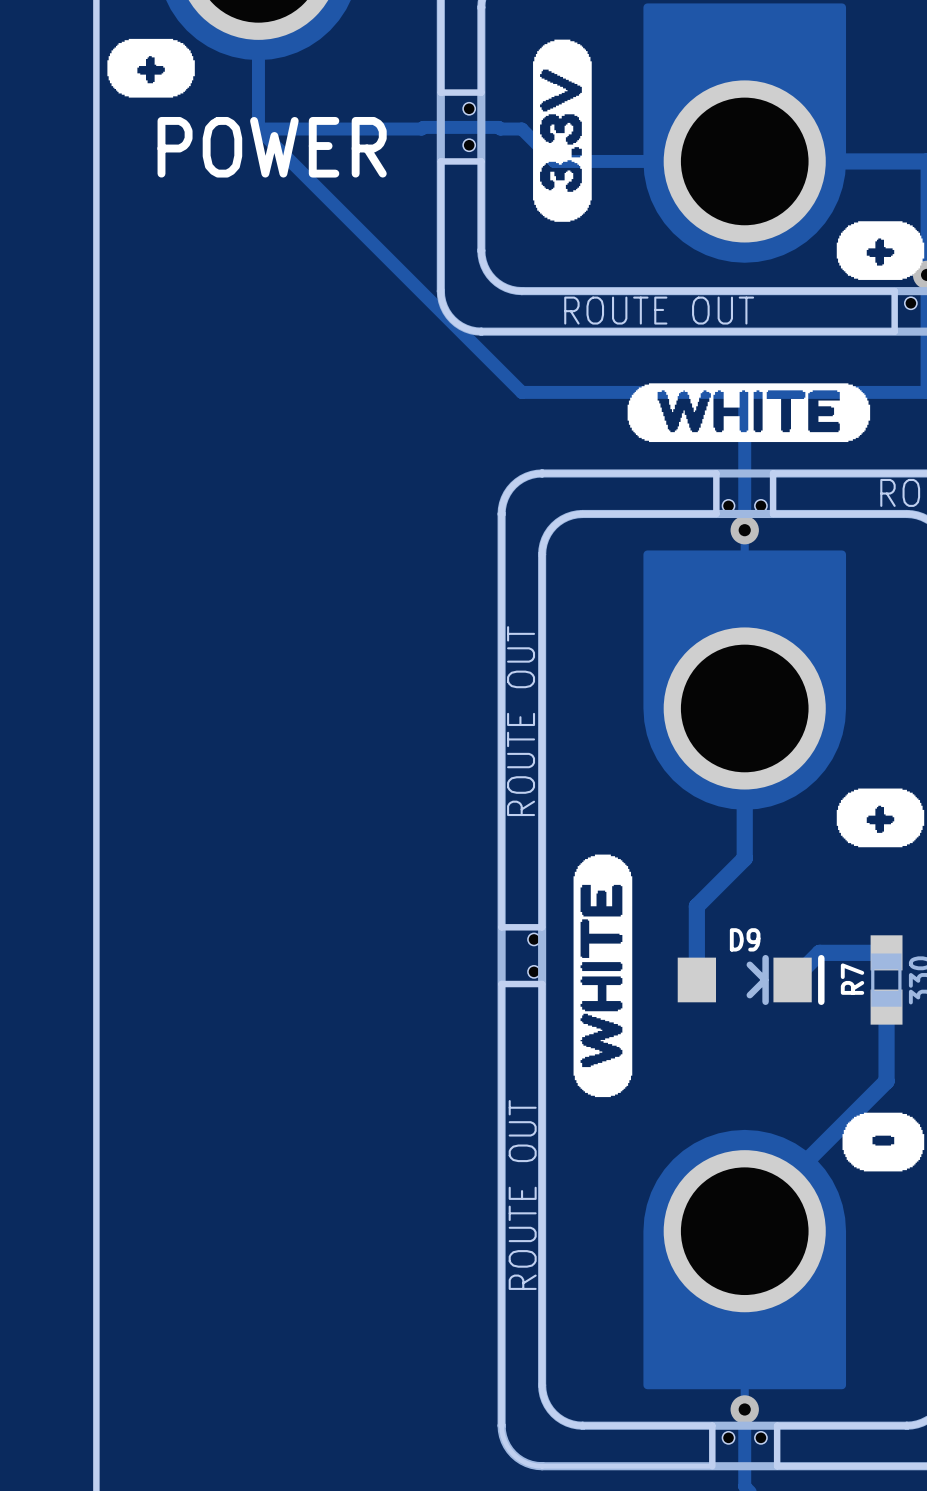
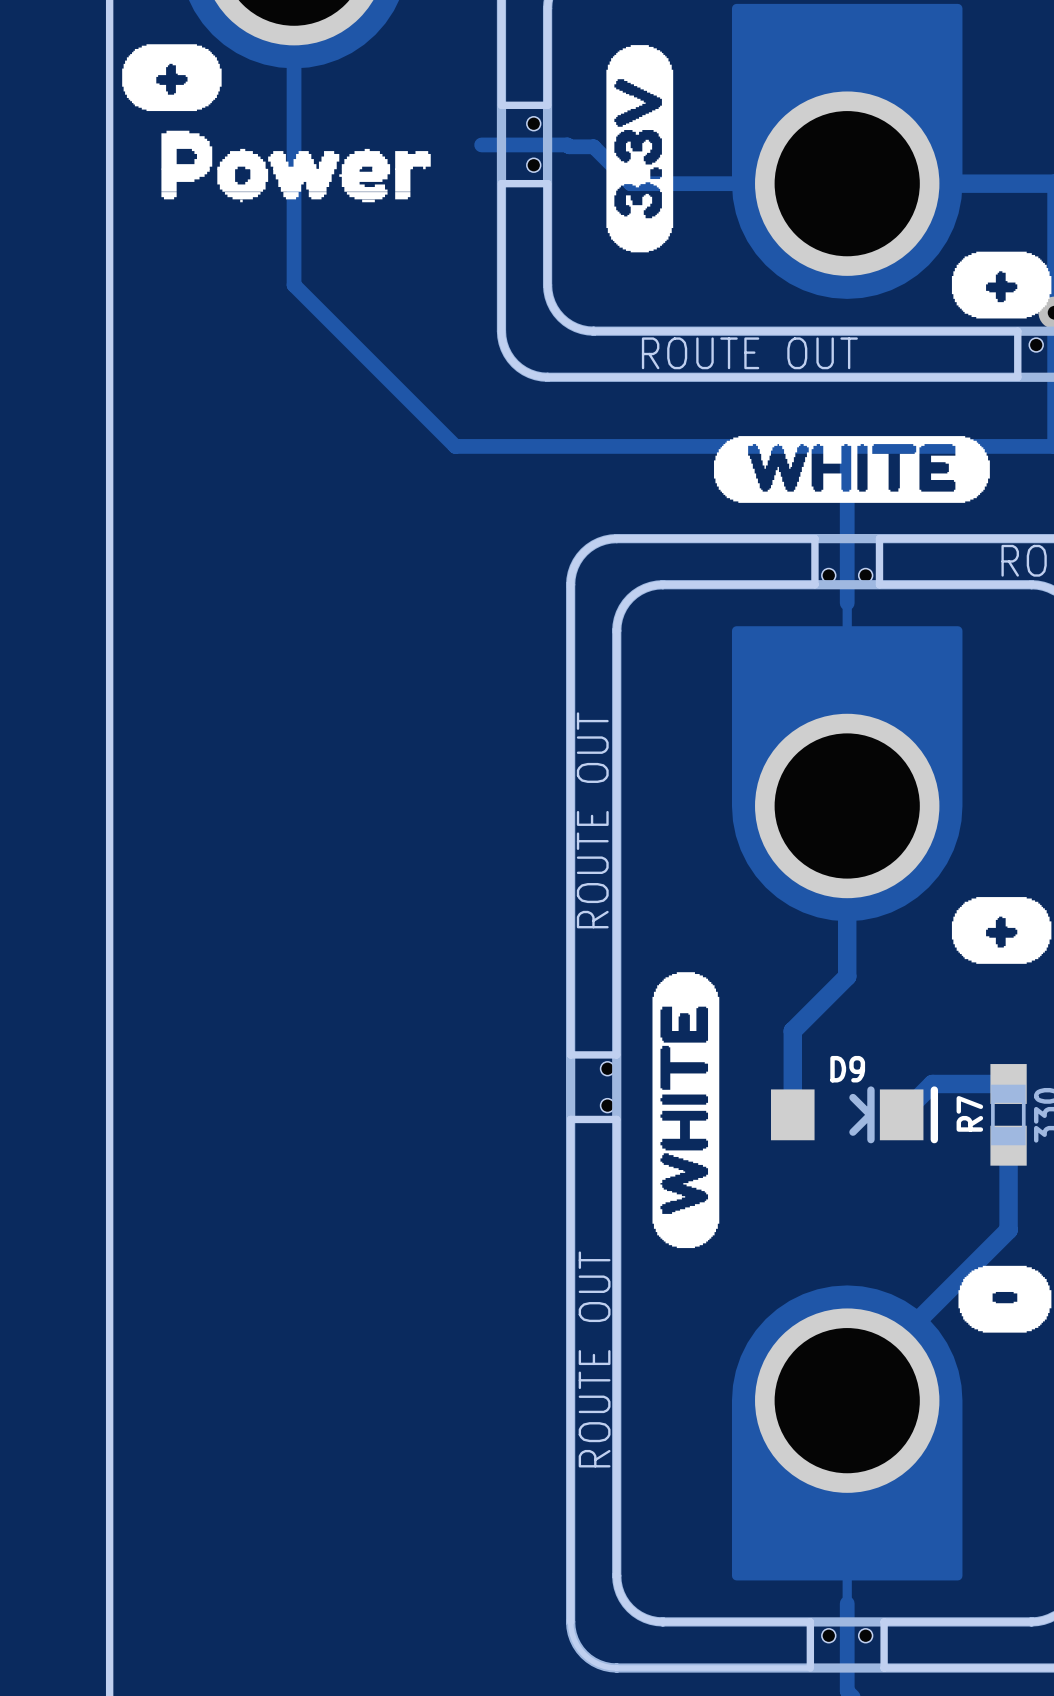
drawing: none -> [161, 130, 431, 203]
track: (423, 127) (421, 129) (258, 129) (521, 392) -> (294, 146) (294, 285) (455, 446) (593, 446)
text: POWER (272, 147) -> none
via: (744, 530) -> none
via: (744, 1409) -> none

